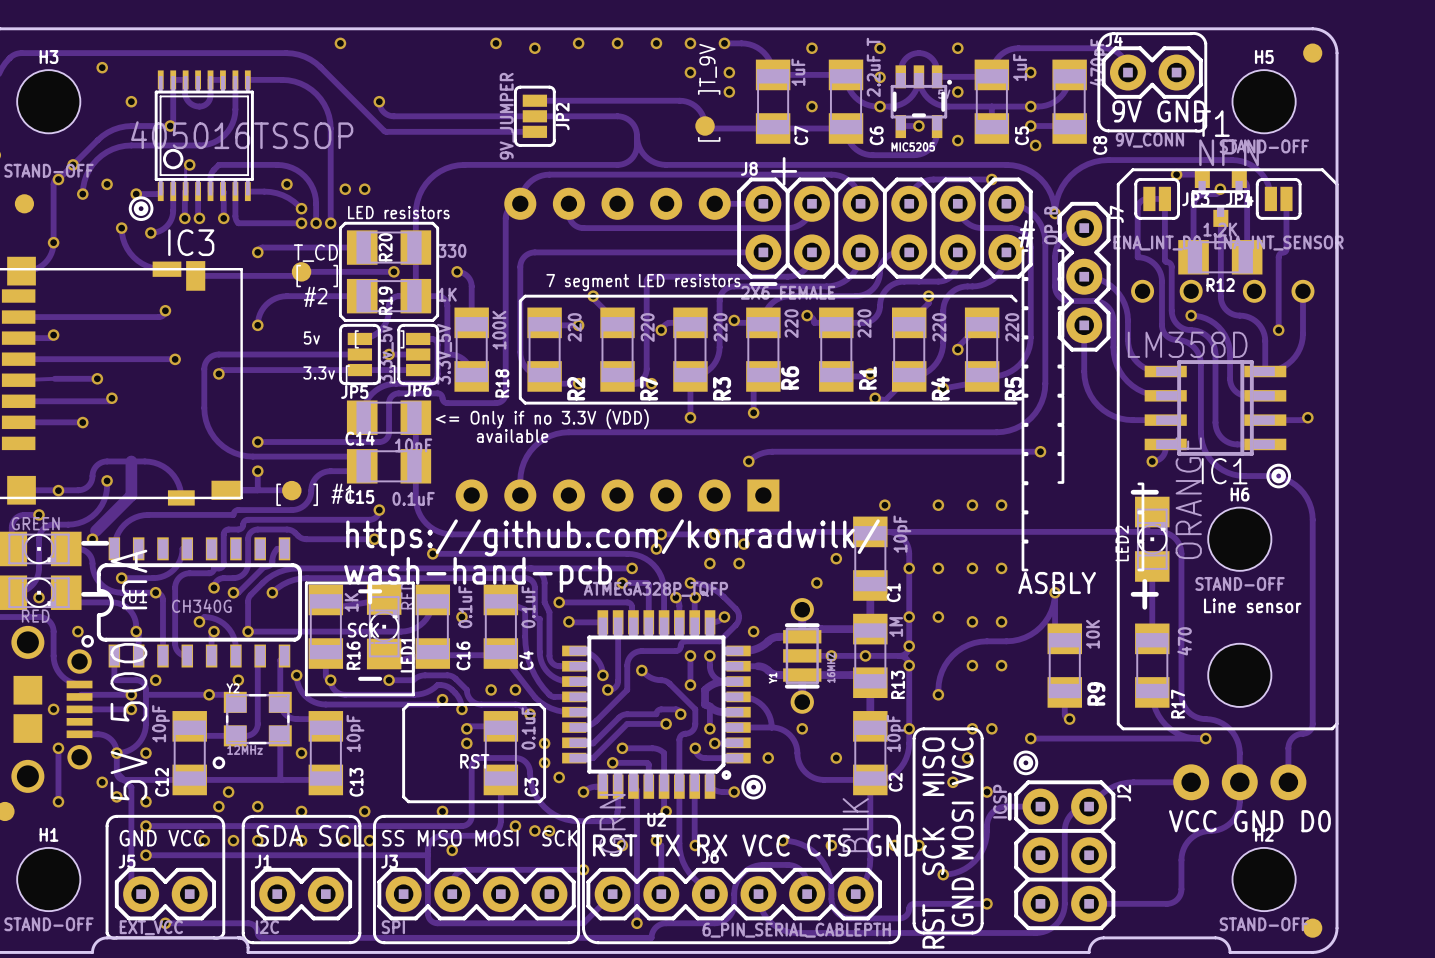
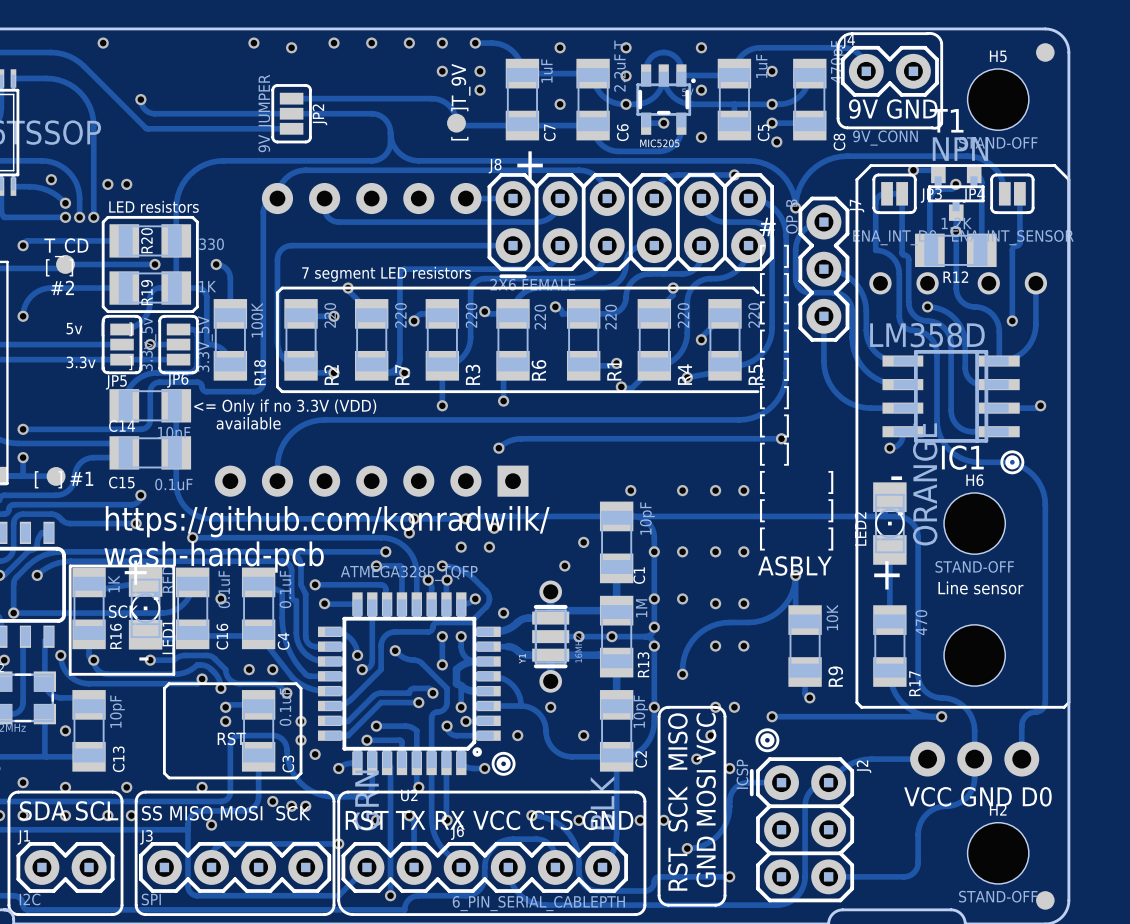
via: none -> (955, 231)

